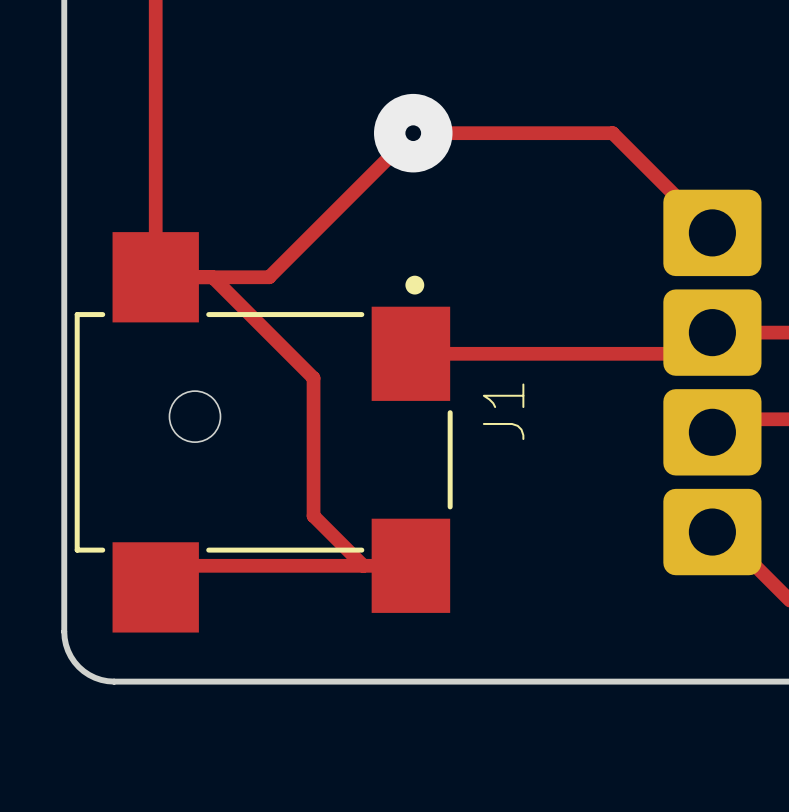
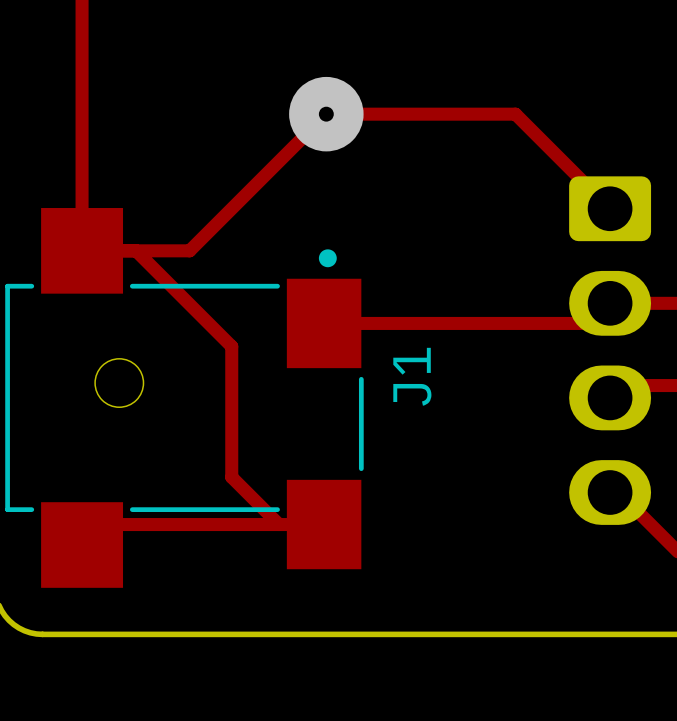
part footprint: [663, 189, 762, 576] -> [569, 176, 652, 525]

